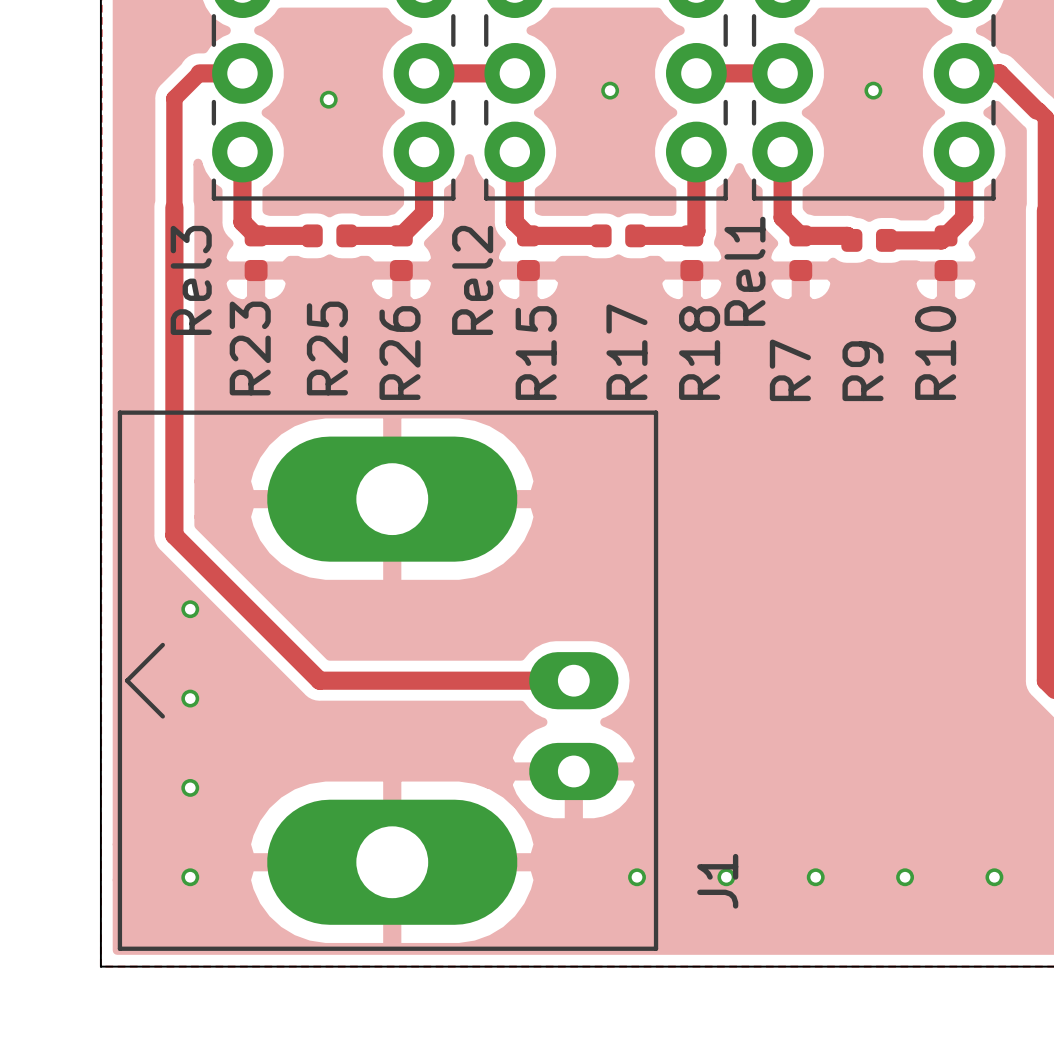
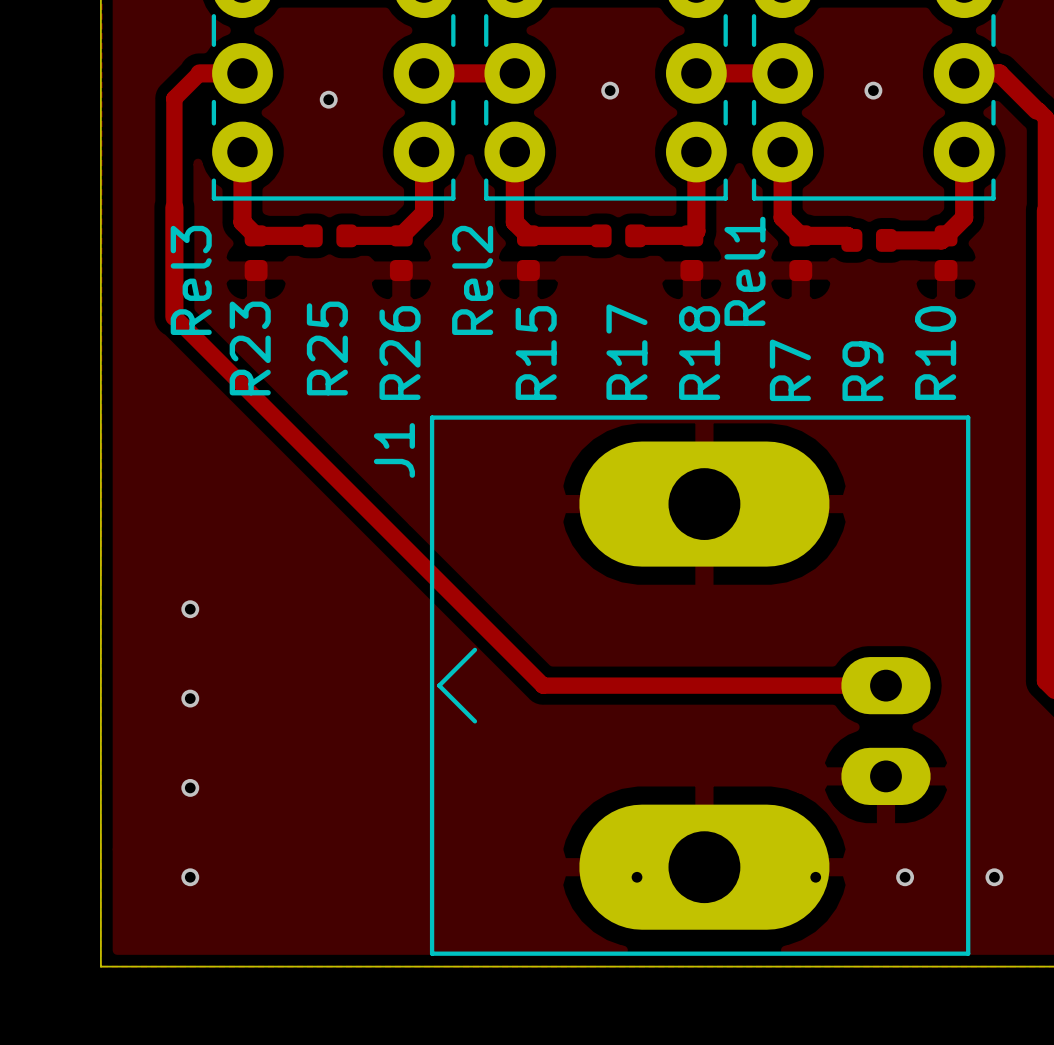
track: (174, 316) (174, 535) (319, 680) (573, 680) -> (174, 316) (543, 685) (885, 685)
J1 position: (387, 680) -> (700, 685)
J1 name position: J1 (717, 881) -> J1 (394, 450)

